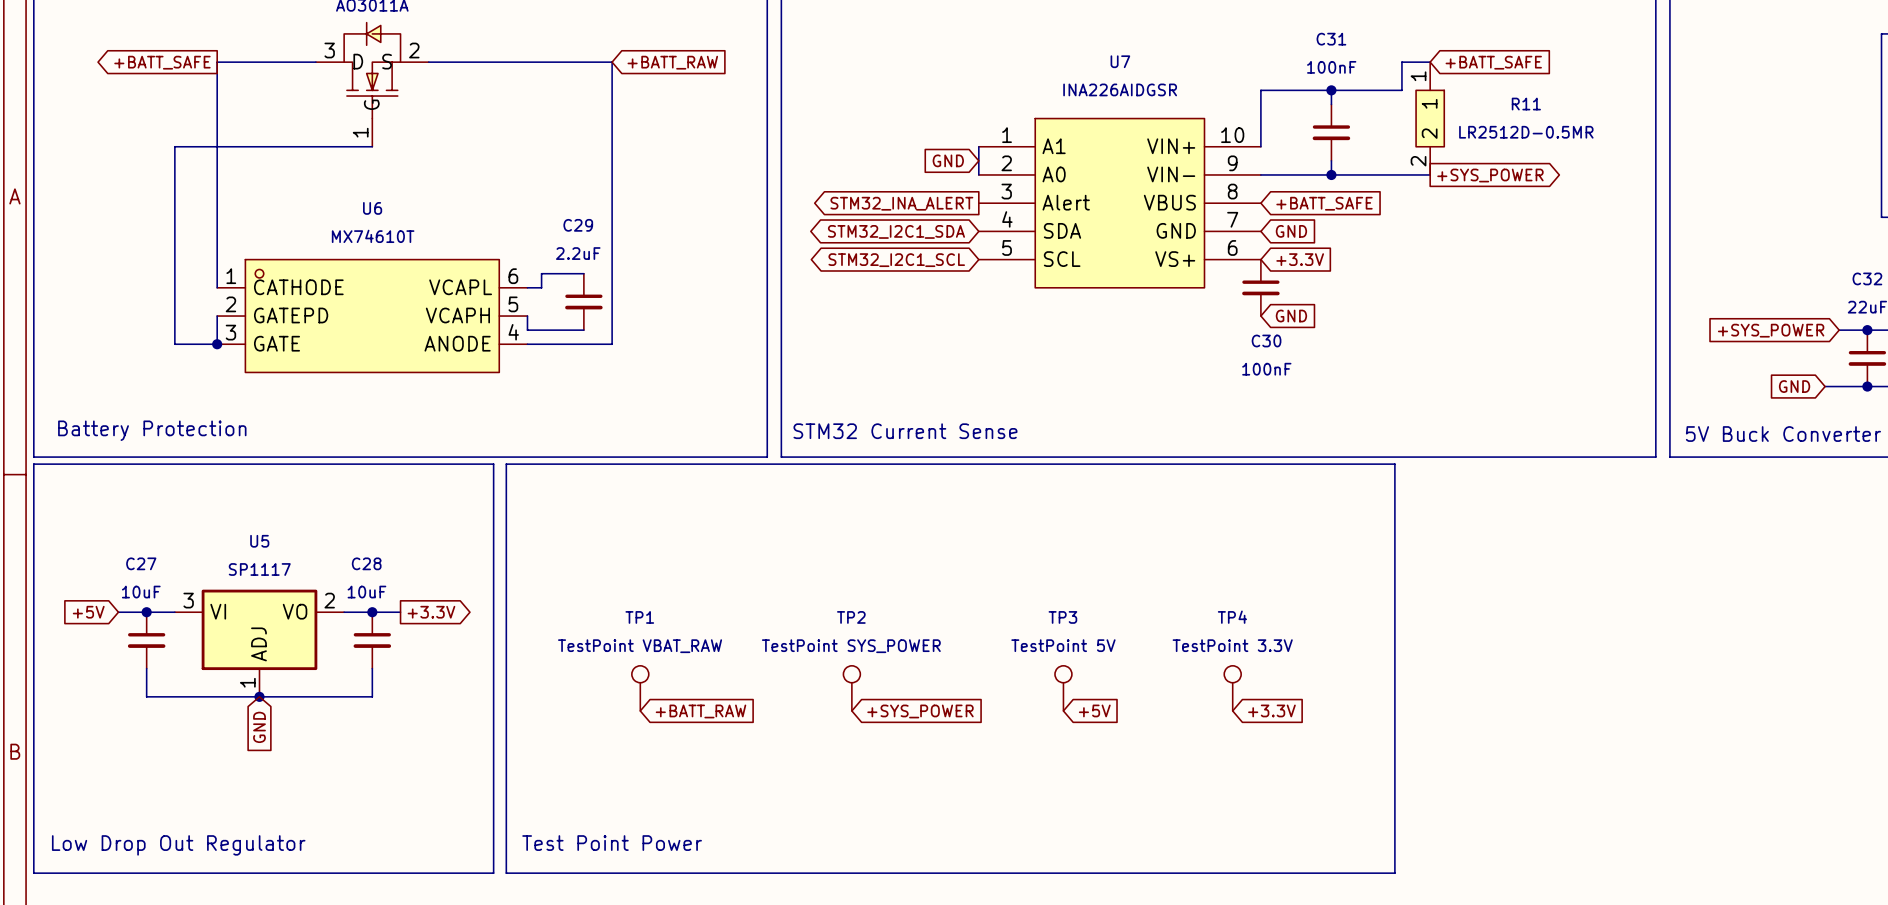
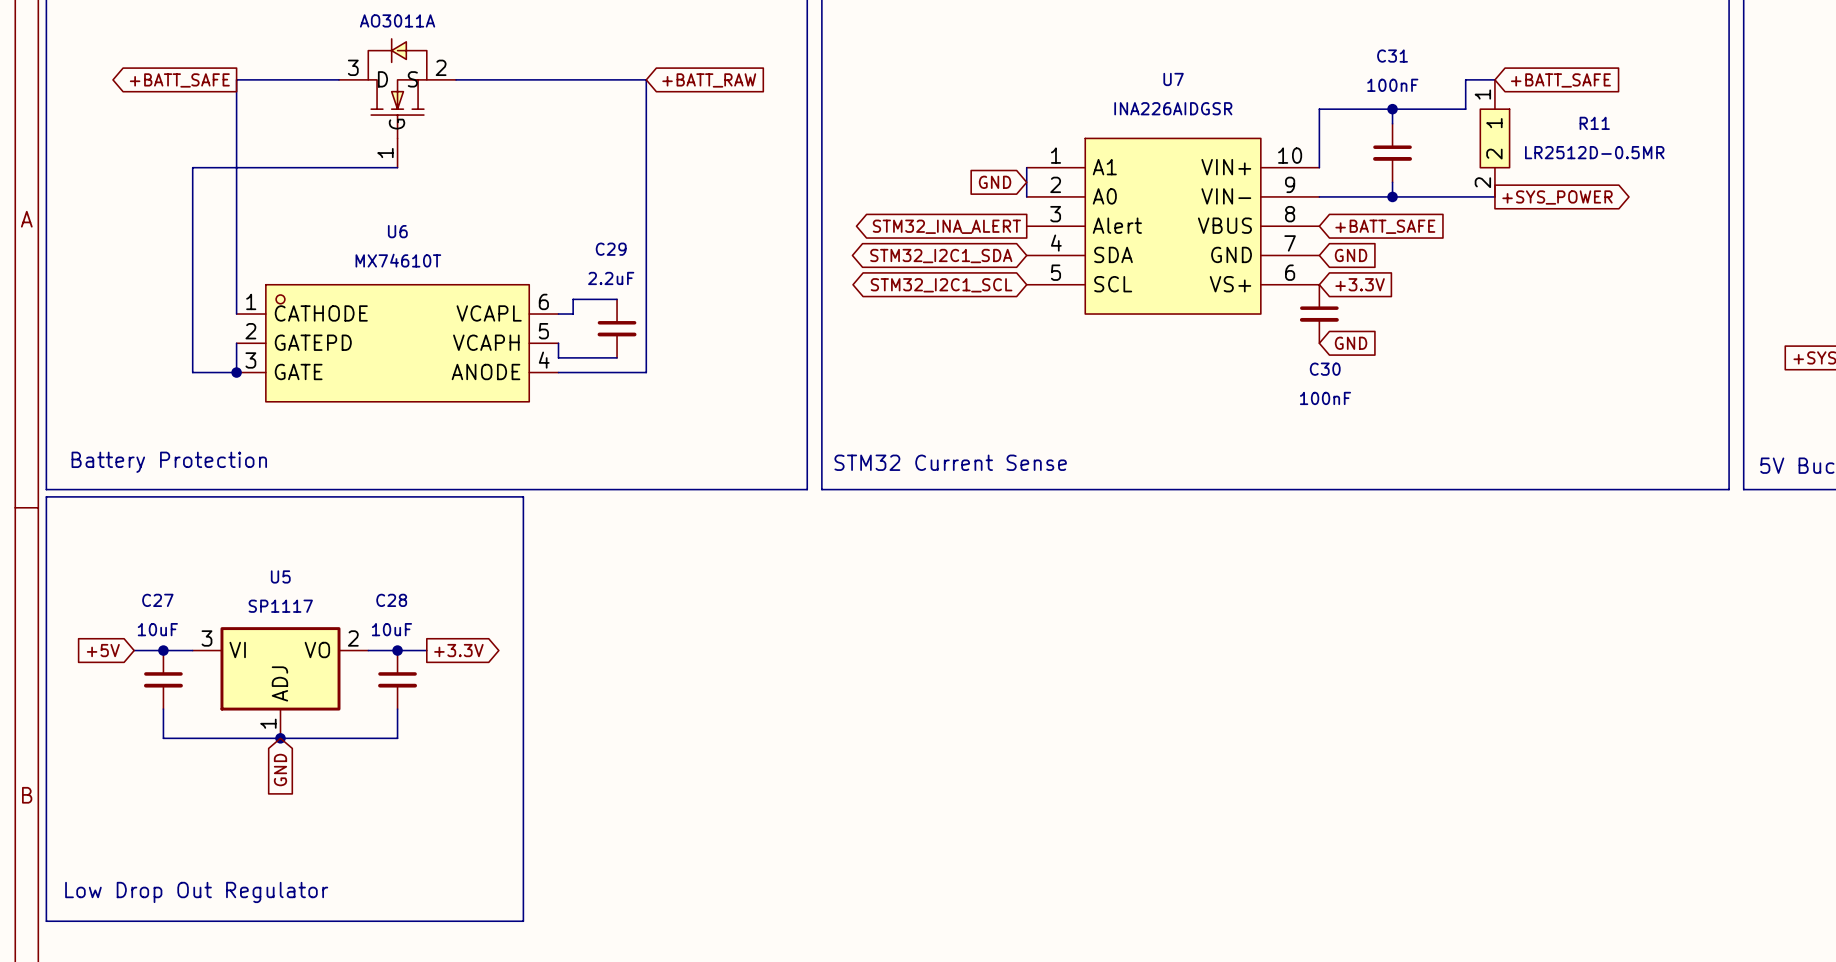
line: (506, 464) (1394, 464) (1394, 873) (506, 873) (506, 464) -> none
TP1: TestPoint VBAT_RAW (640, 688) -> none
TP2: TestPoint SYS_POWER (851, 688) -> none
TP3: TestPoint 5V (1063, 688) -> none
TP4: TestPoint 3.3V (1232, 688) -> none
global label: +5V (1094, 710) -> none
global label: +3.3V (1271, 710) -> none
global label: +BATT_RAW (700, 711) -> none
global label: +SYS_POWER (920, 711) -> none
text: Test Point Power (612, 843) -> none

